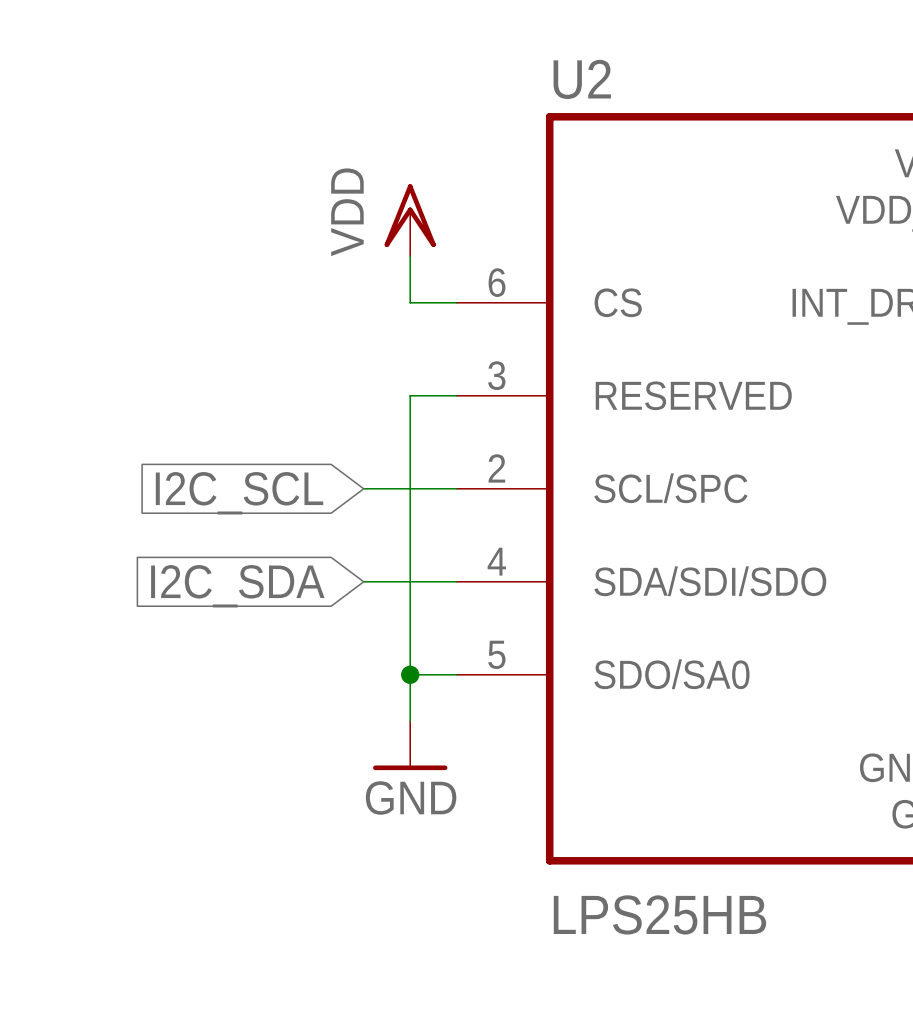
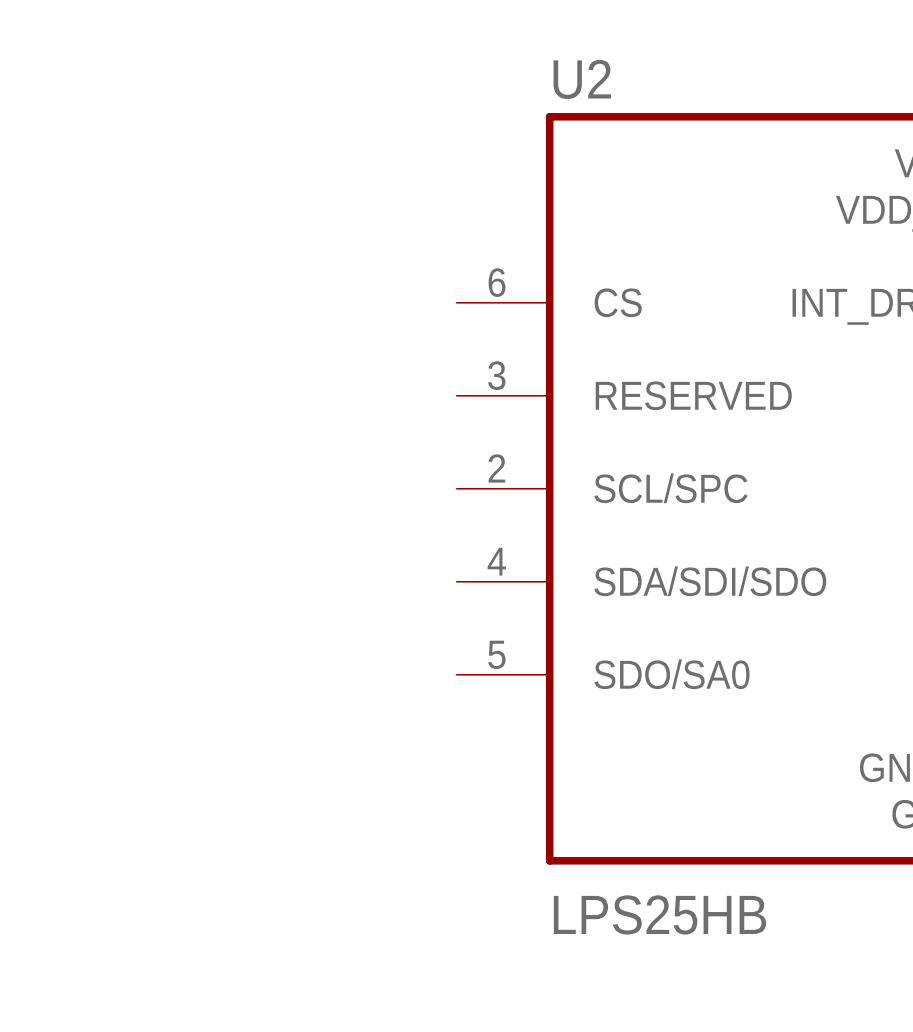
power symbol: VDD (410, 220) -> none
wire: (410, 256) (410, 302) (456, 302) -> none
wire: (456, 395) (410, 395) (410, 721) -> none
wire: (363, 488) (456, 488) -> none
global label: I2C_SCL (239, 493) -> none
wire: (363, 581) (456, 581) -> none
global label: I2C_SDA (237, 586) -> none
wire: (410, 674) (456, 674) -> none
junction: (410, 674) -> none
power symbol: GND (410, 745) -> none

